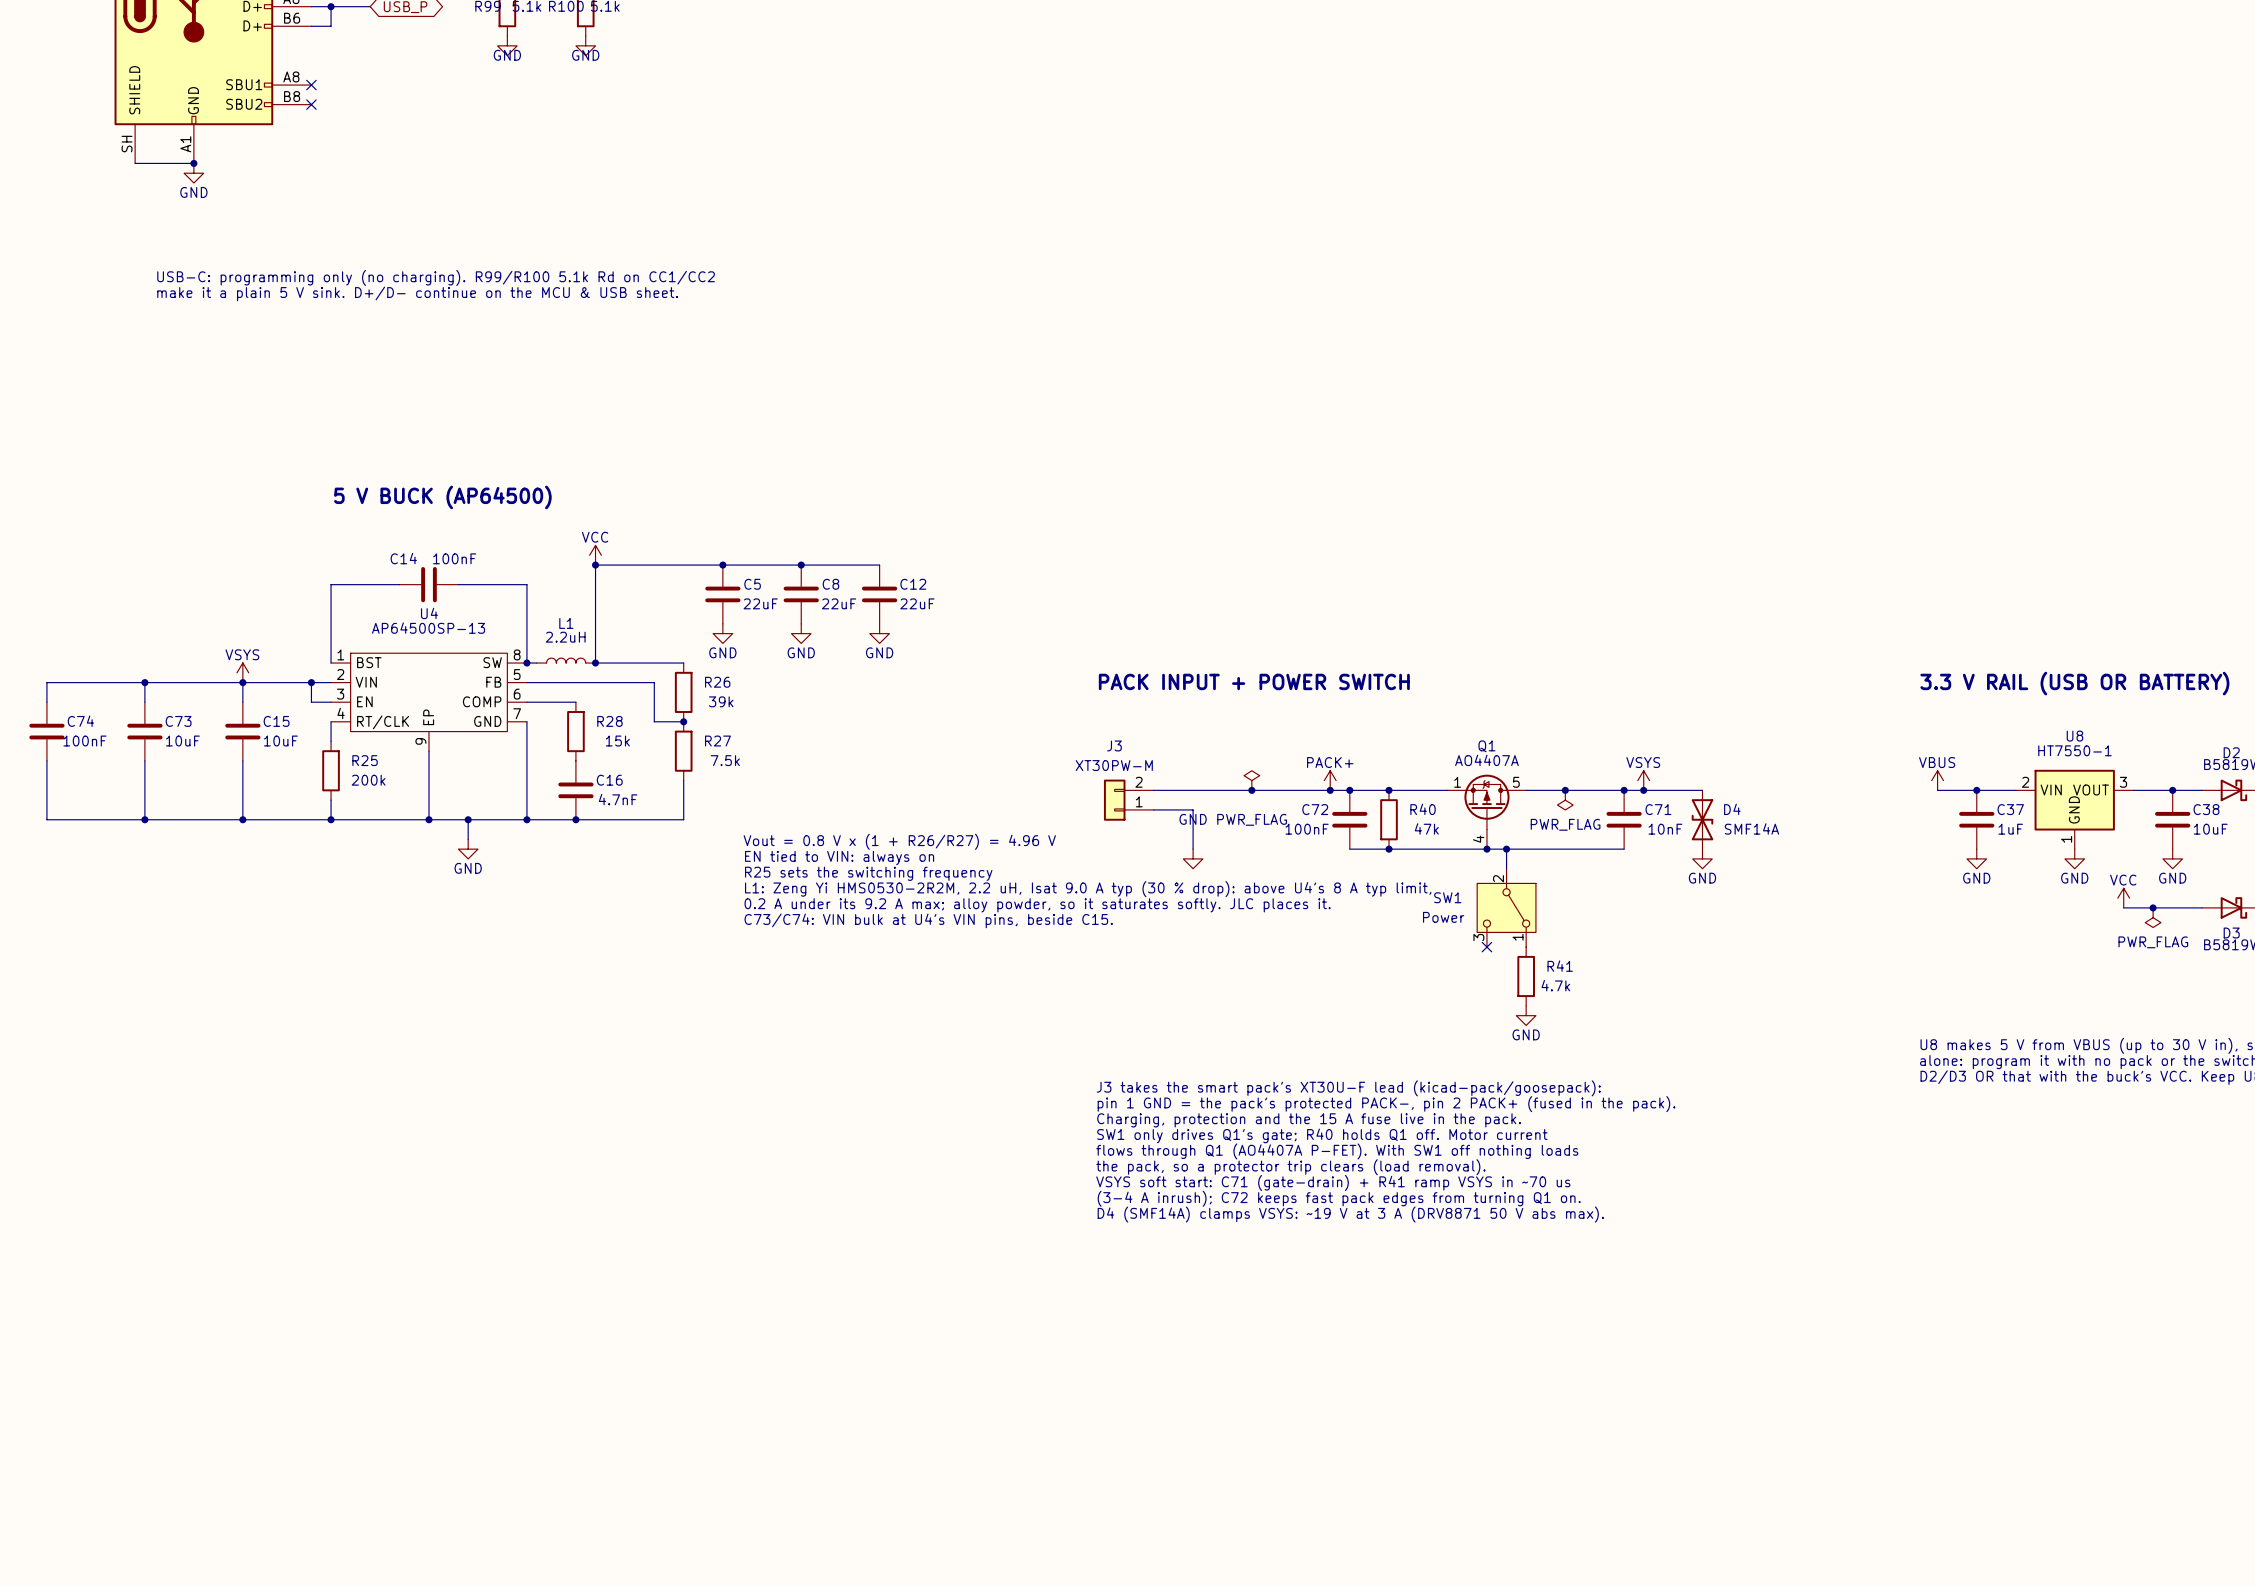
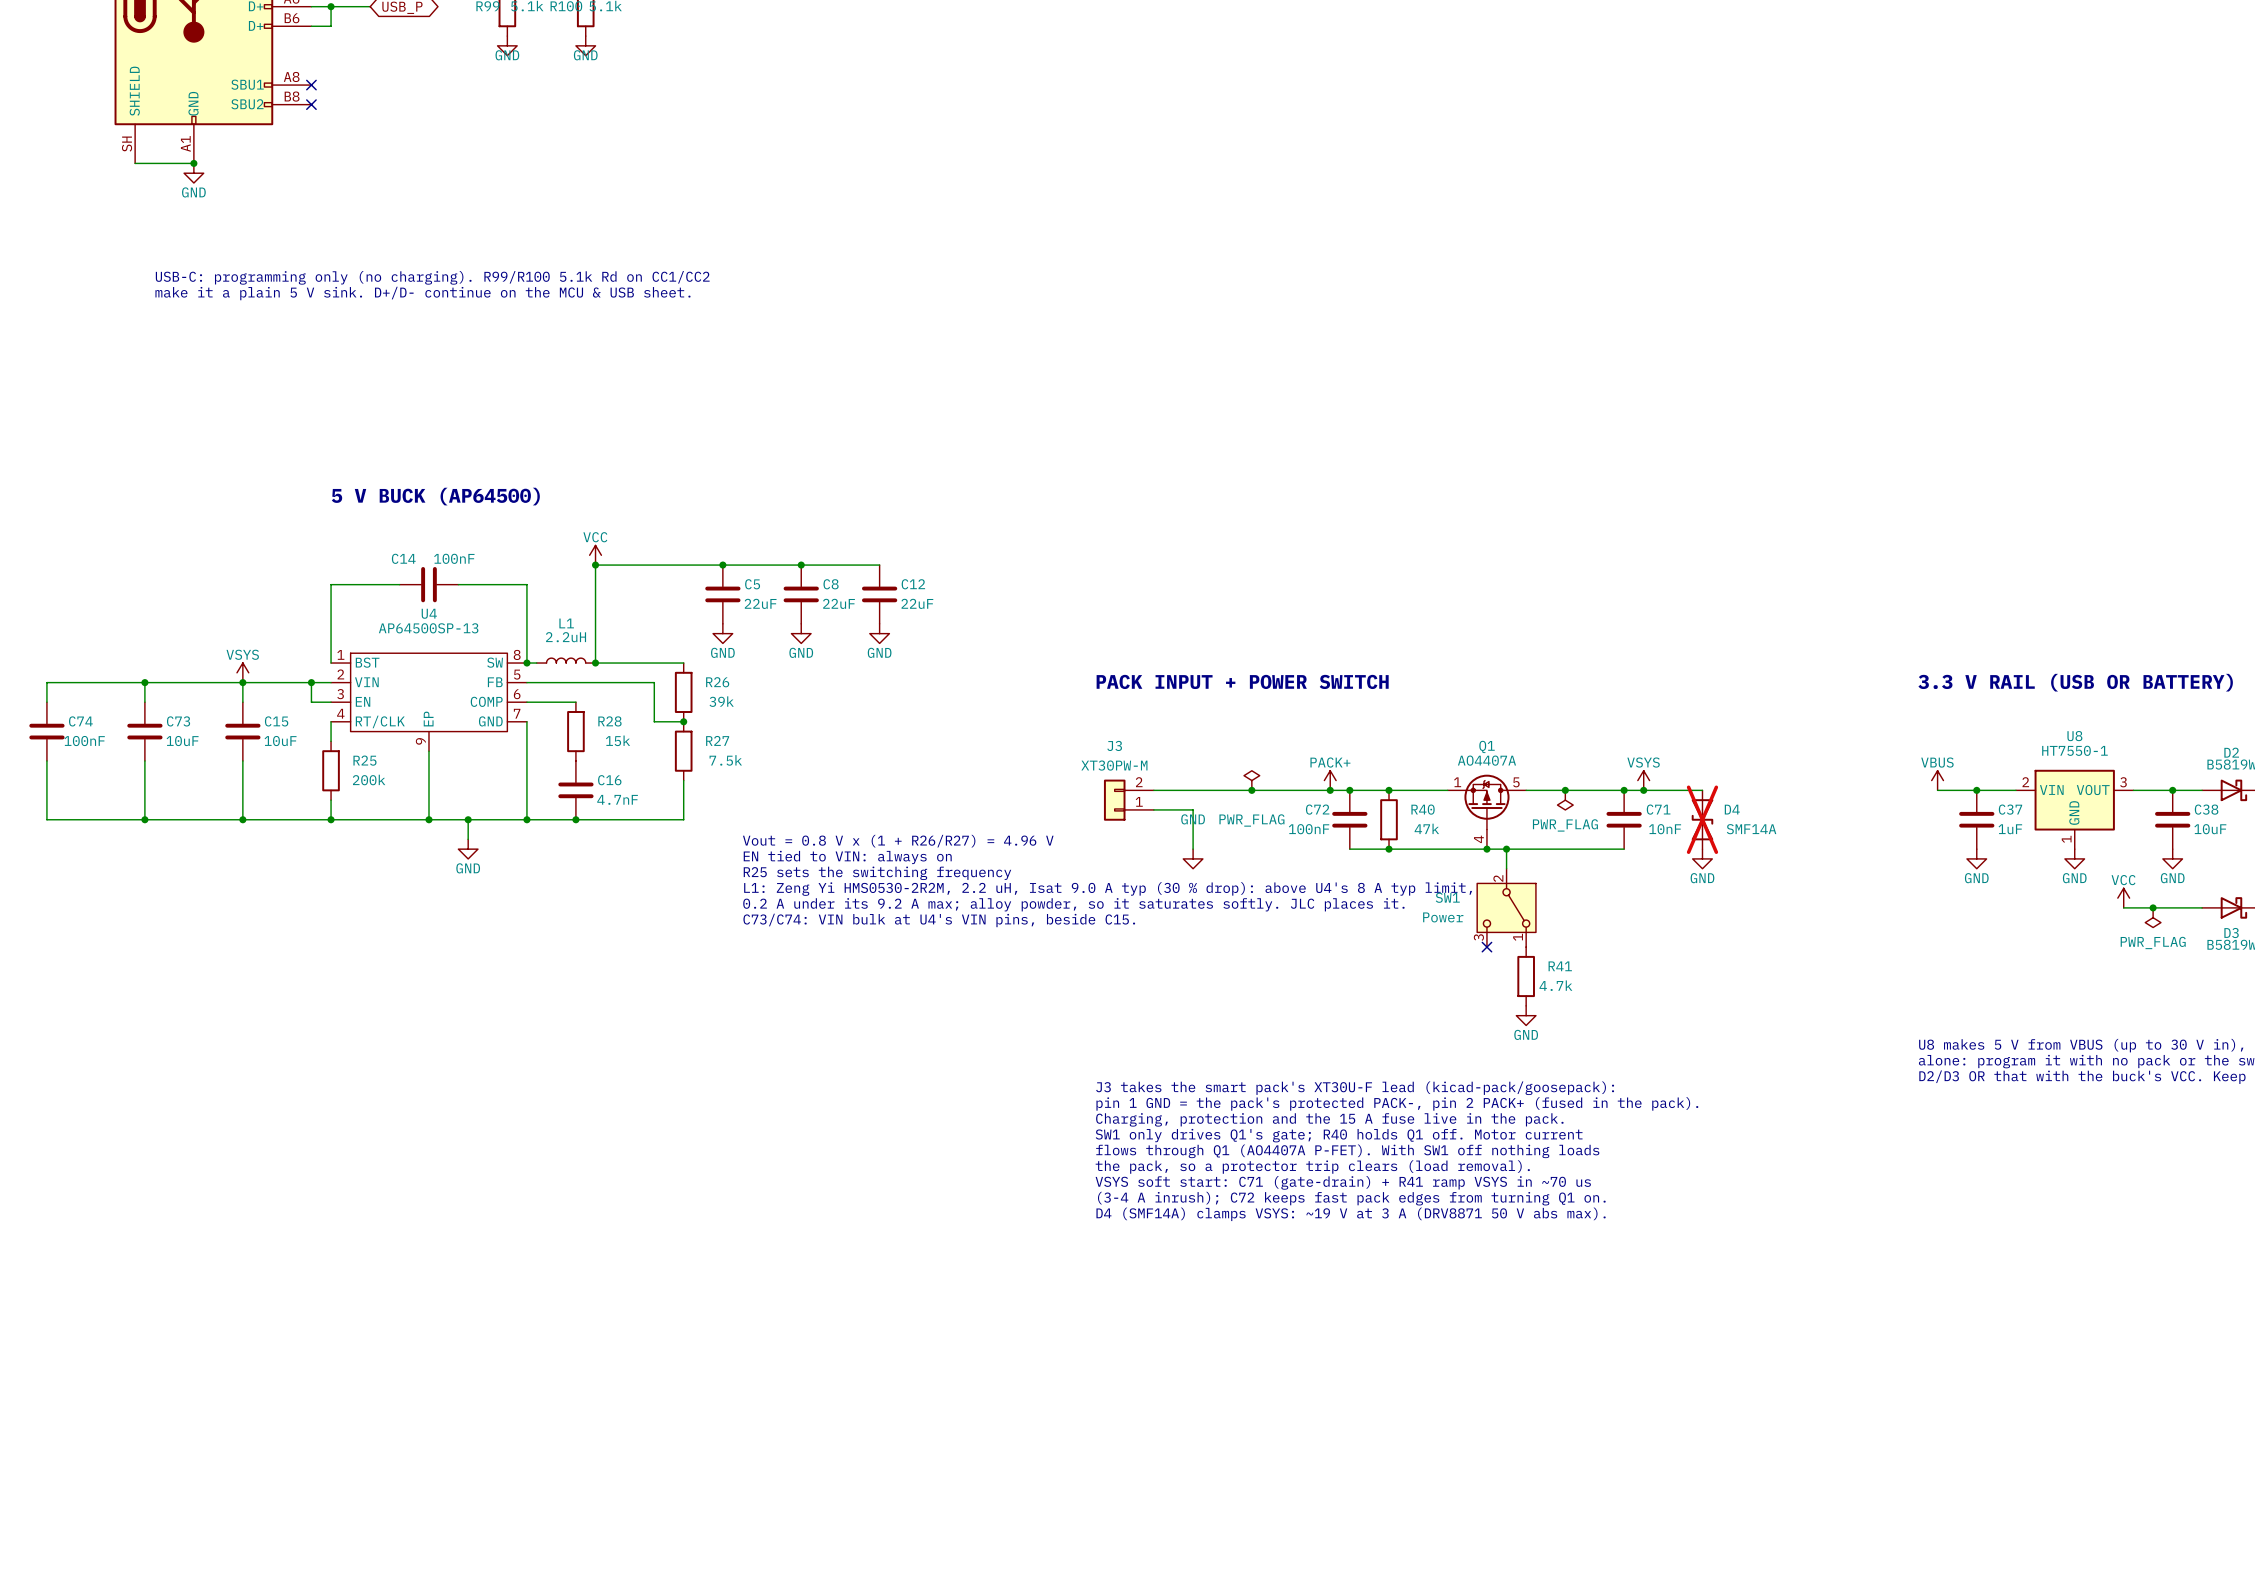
D4 do-not-place cross: none -> (1702, 819)

